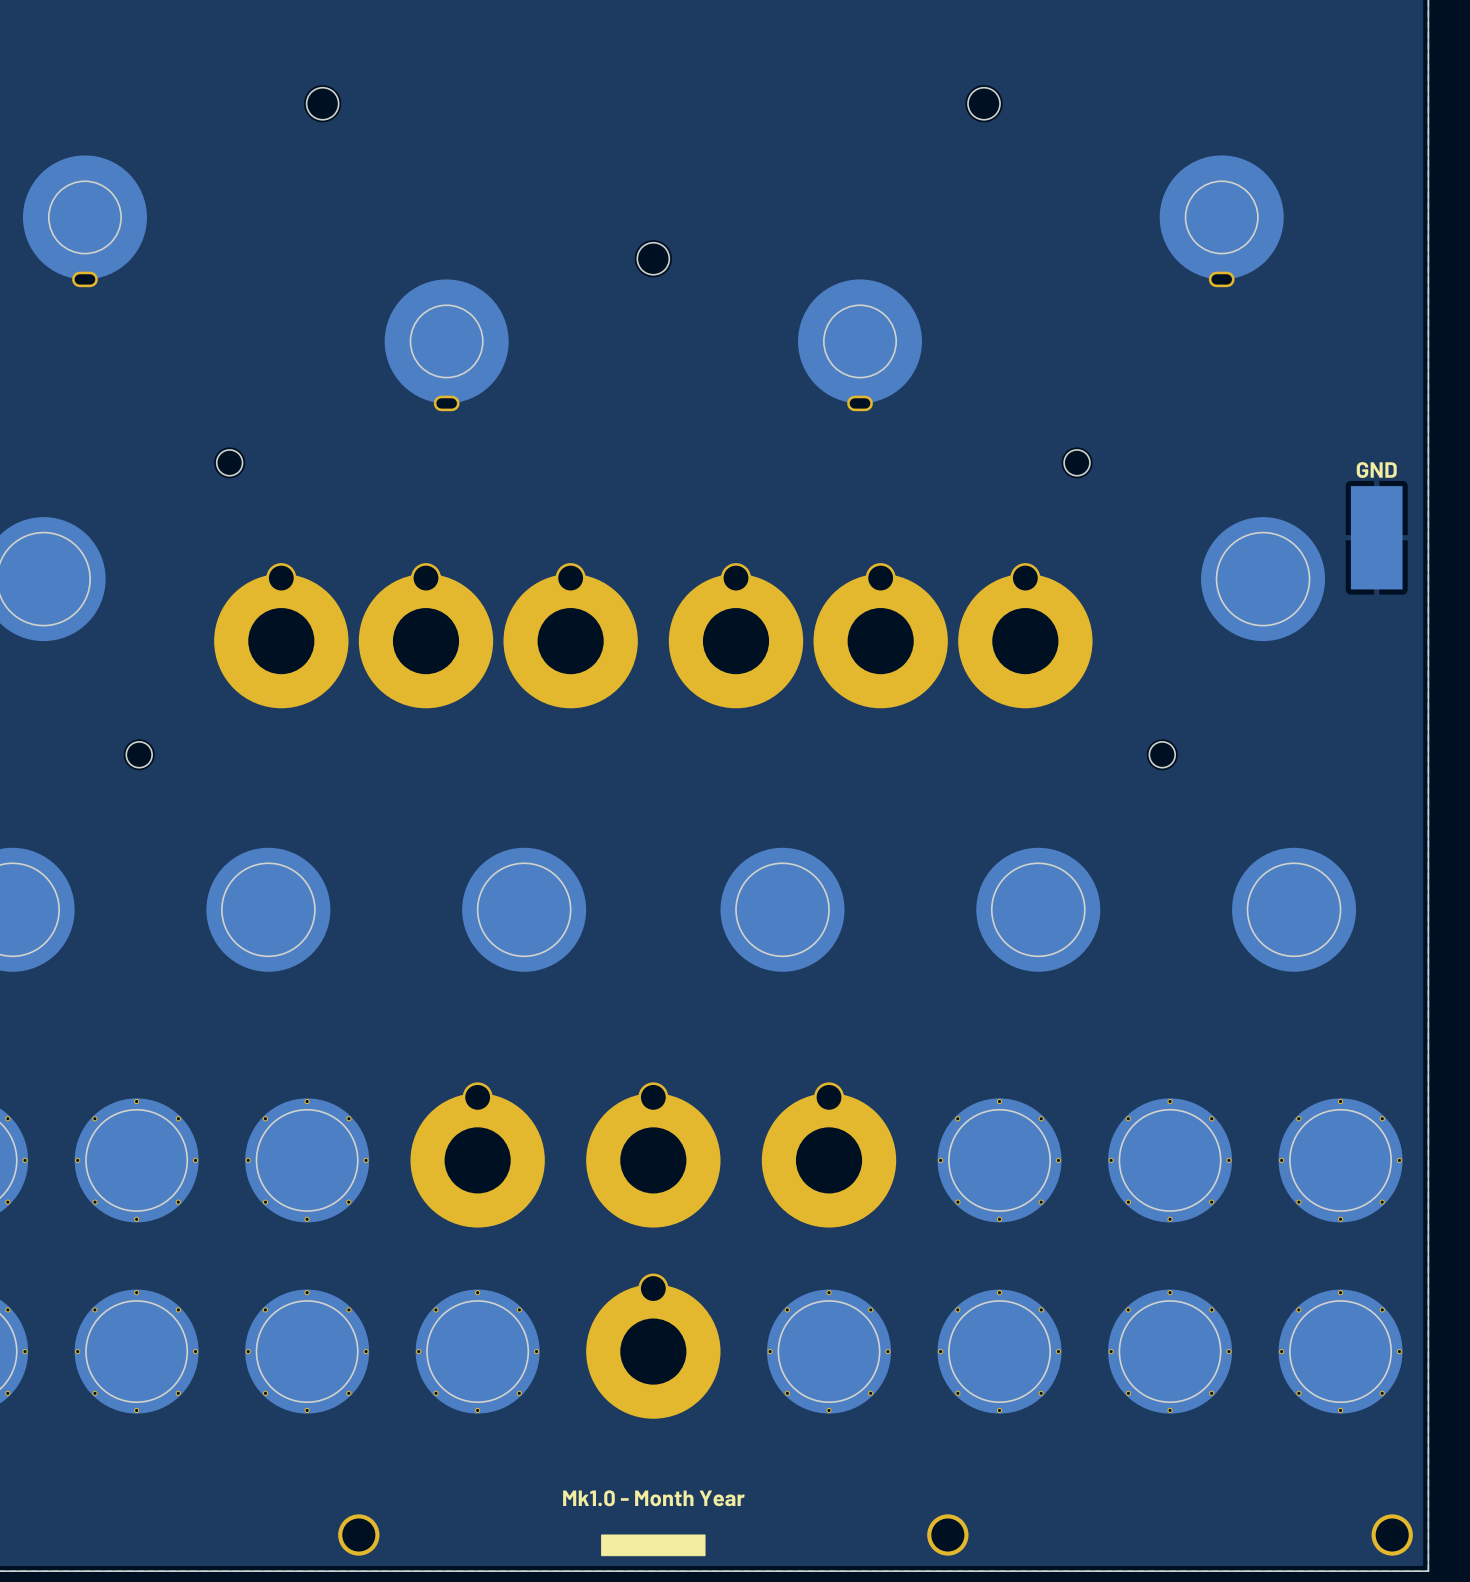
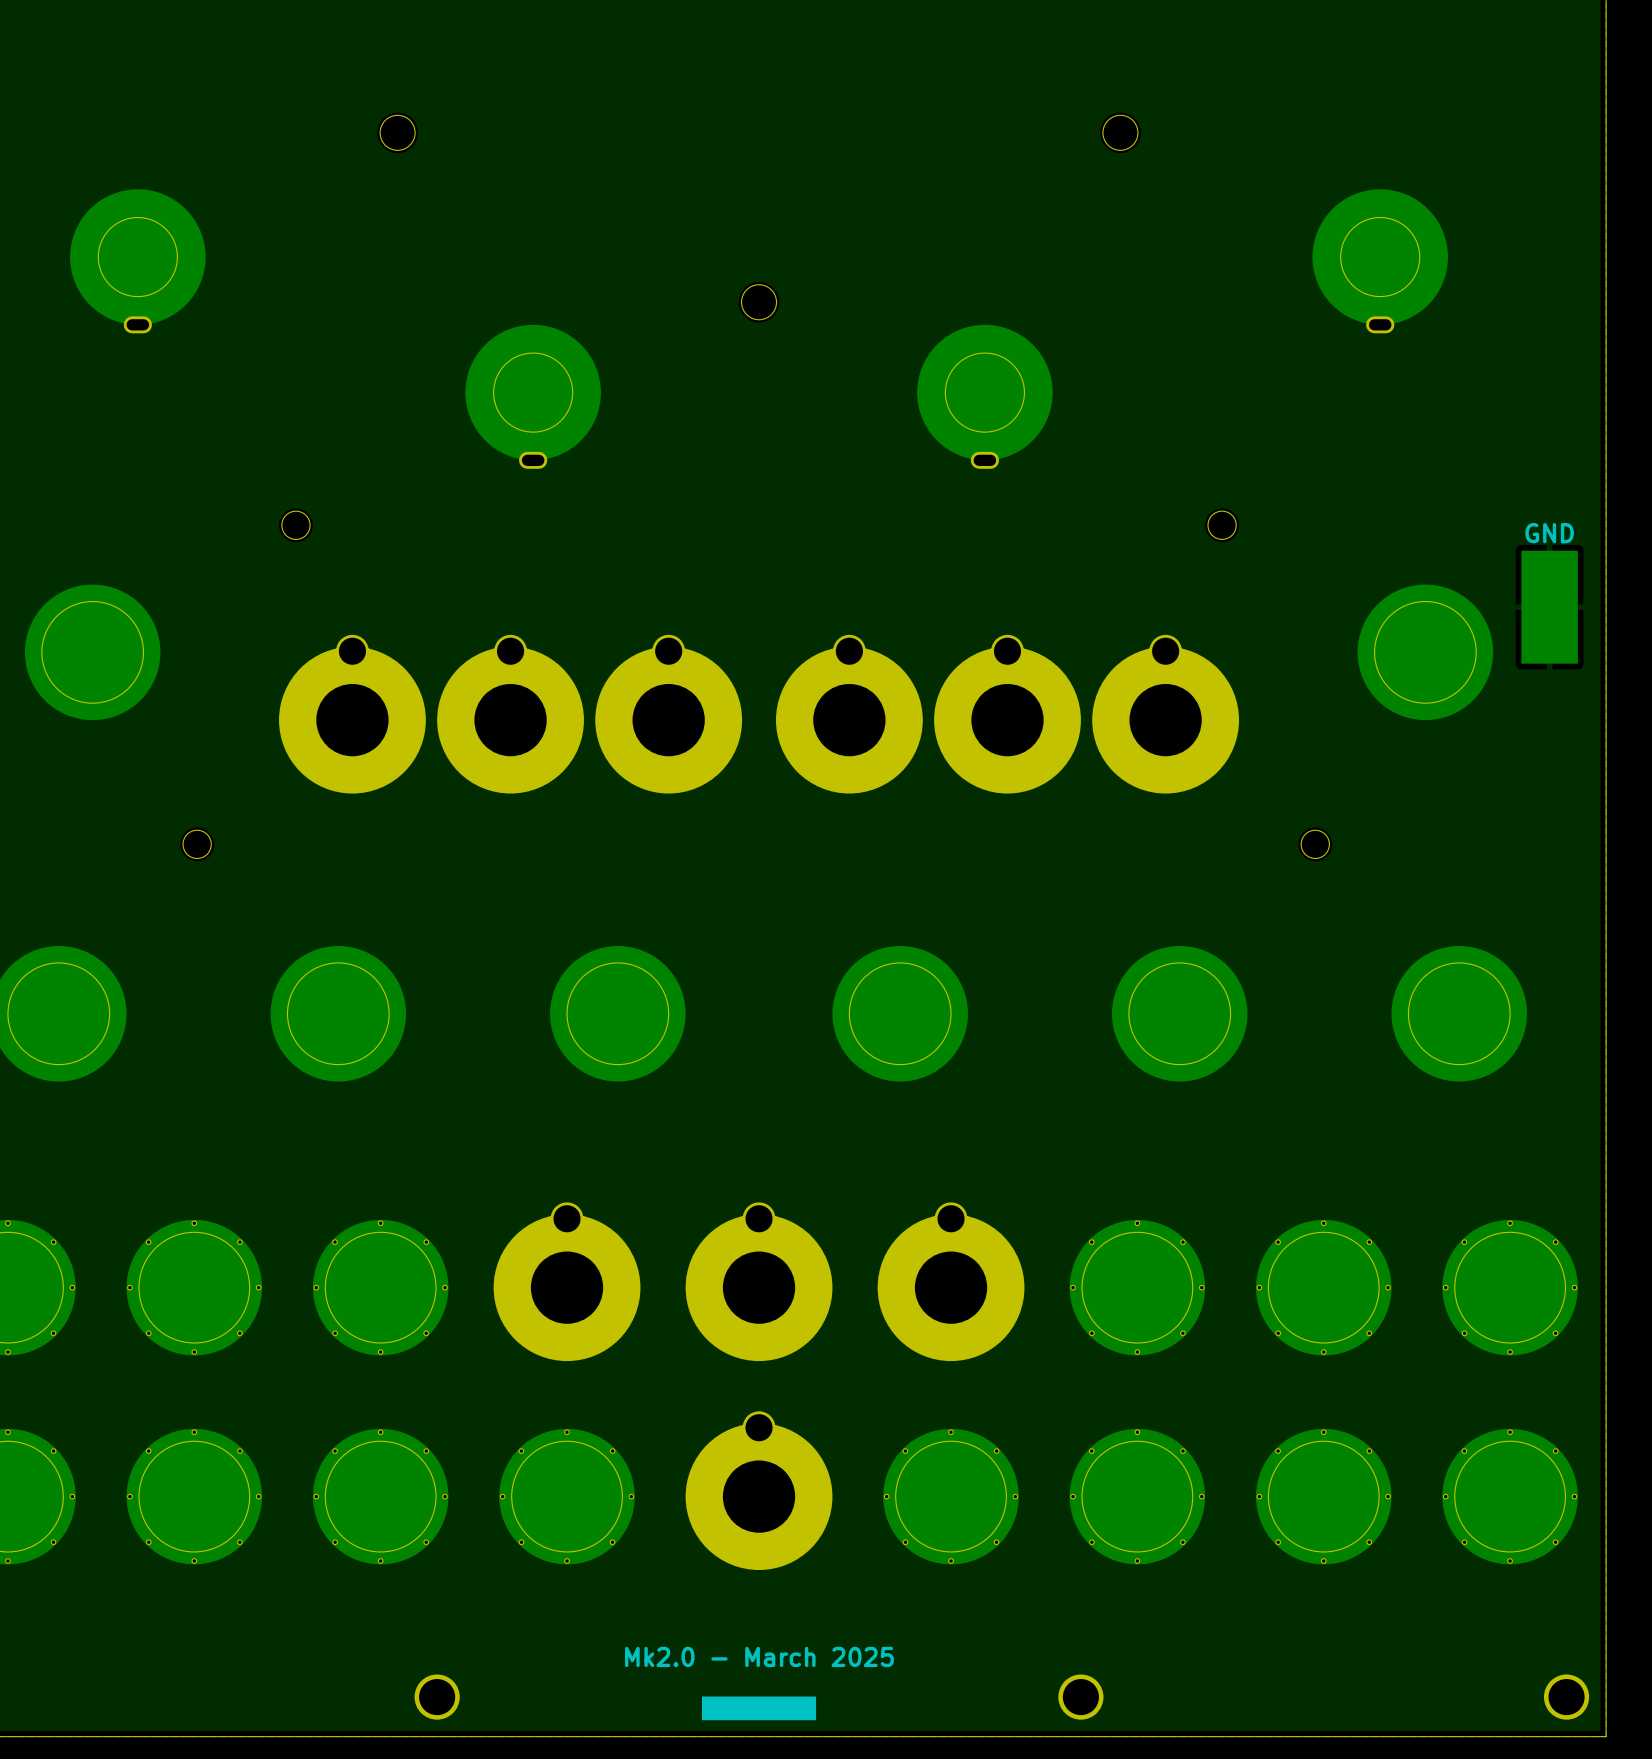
text: Mk1.0 - Month Year (653, 1498) -> Mk2.0 - March 2025 (759, 1656)

